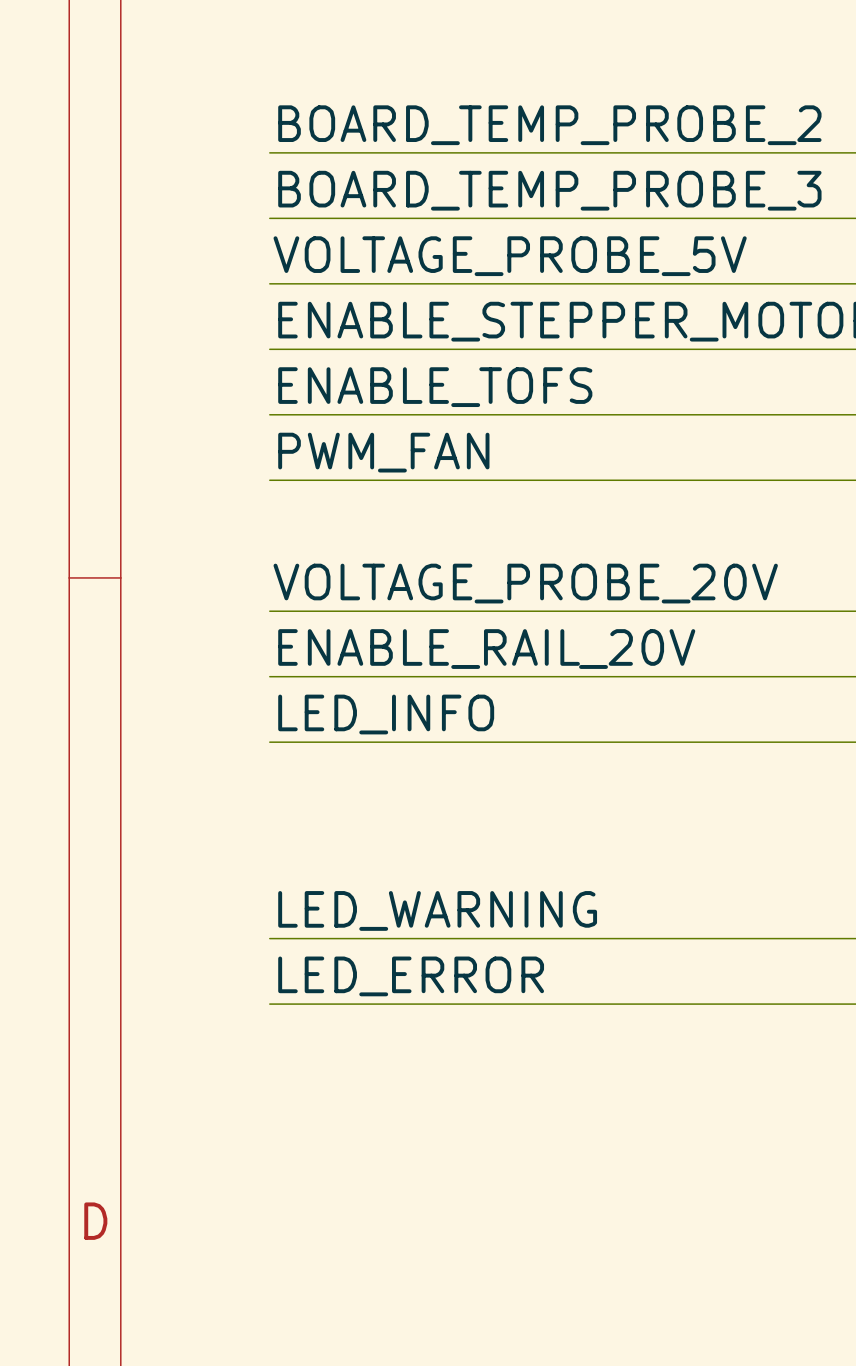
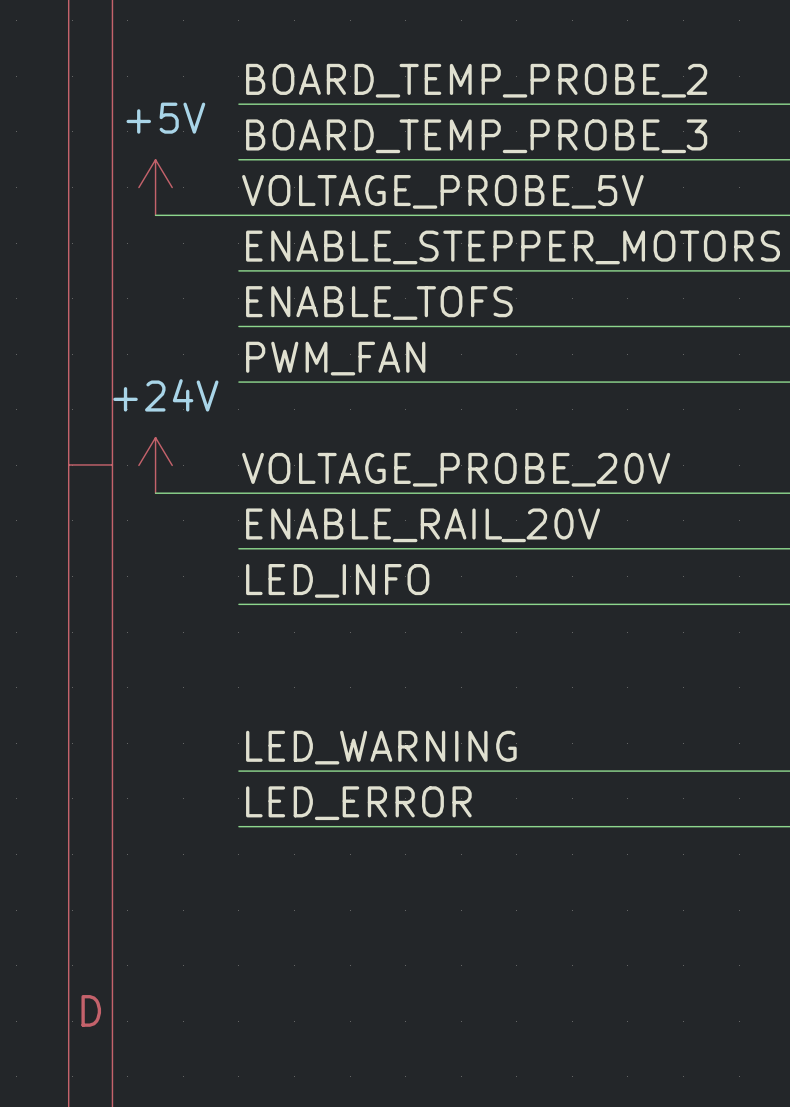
power symbol: none -> +5V (155, 187)
wire: none -> (155, 215) (238, 215)
power symbol: none -> +24V (155, 465)
wire: none -> (155, 493) (238, 493)

